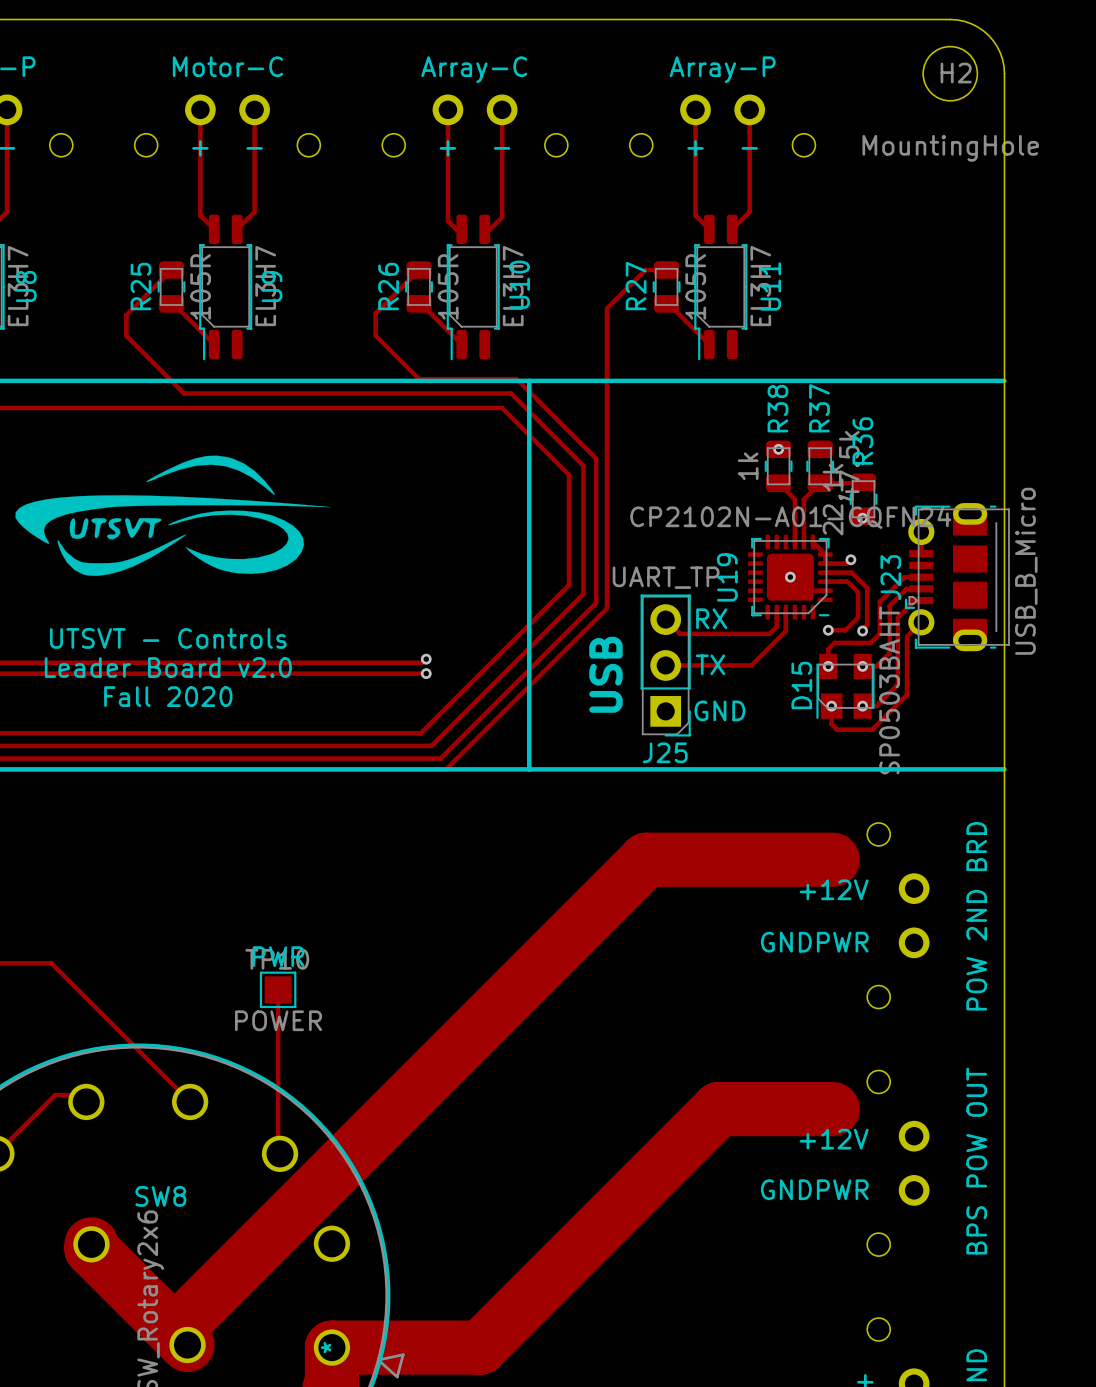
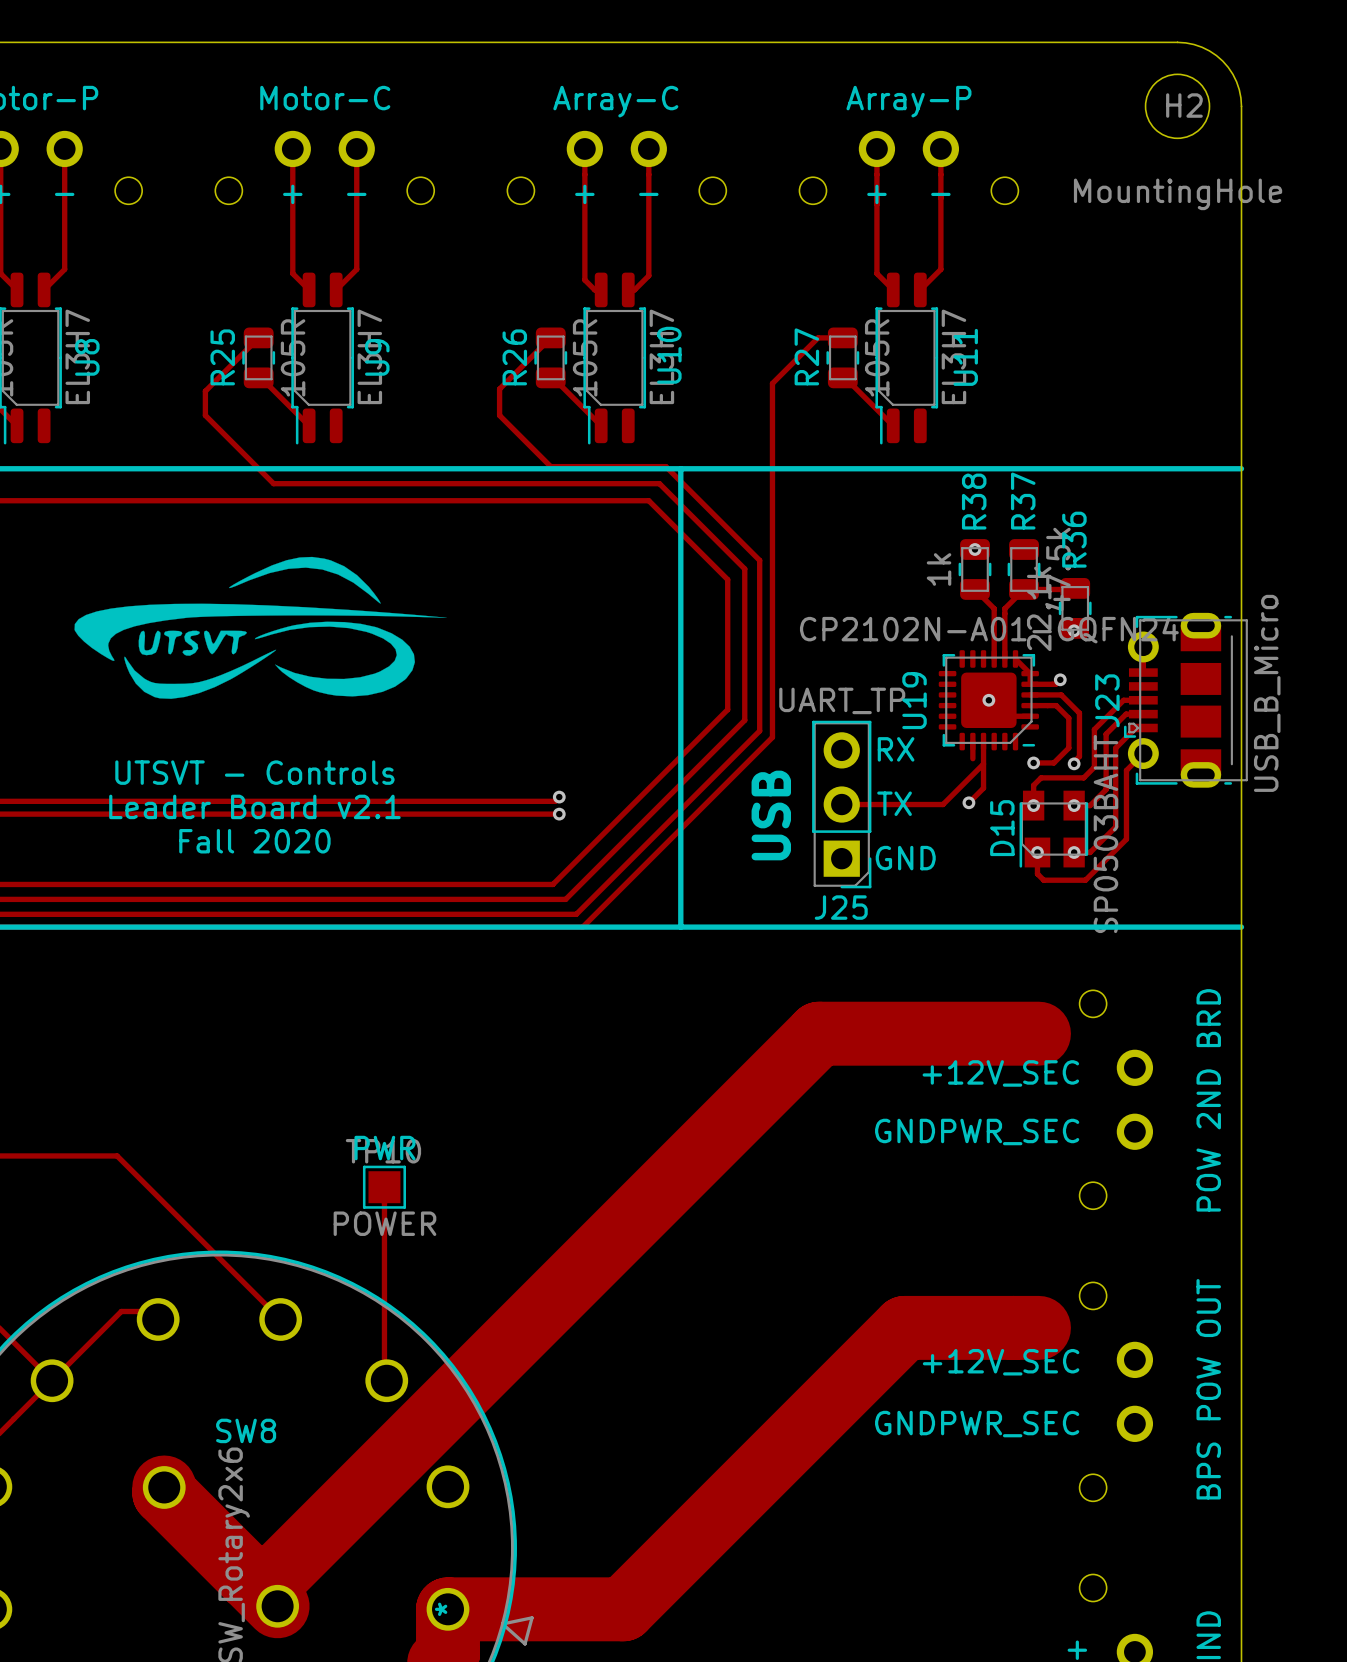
track: (665, 619) (679, 633) (769, 633) (776, 626) -> none
track: none -> (983, 764) (983, 788) (968, 802)
via: none -> (968, 802)
text: Leader Board v2.0 (168, 667) -> Leader Board v2.1 (254, 806)
text: +12V (834, 889) -> +12V_SEC (1000, 1073)
text: GNDPWR (814, 942) -> GNDPWR_SEC (977, 1131)
text: +12V (834, 1139) -> +12V_SEC (1001, 1362)
text: GNDPWR (814, 1189) -> GNDPWR_SEC (977, 1424)

